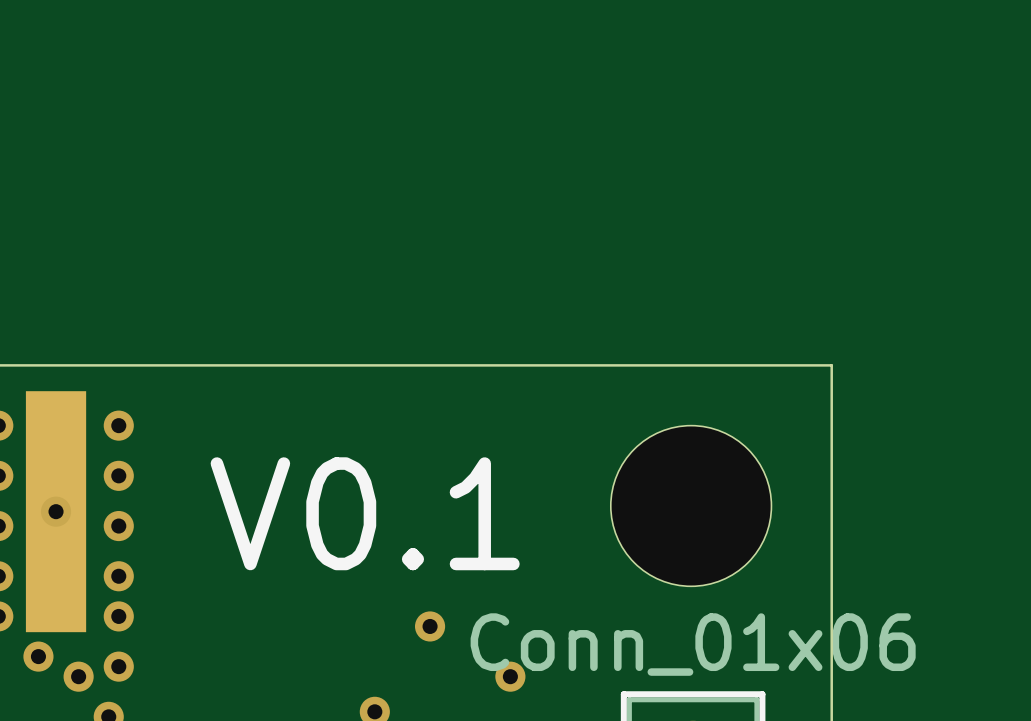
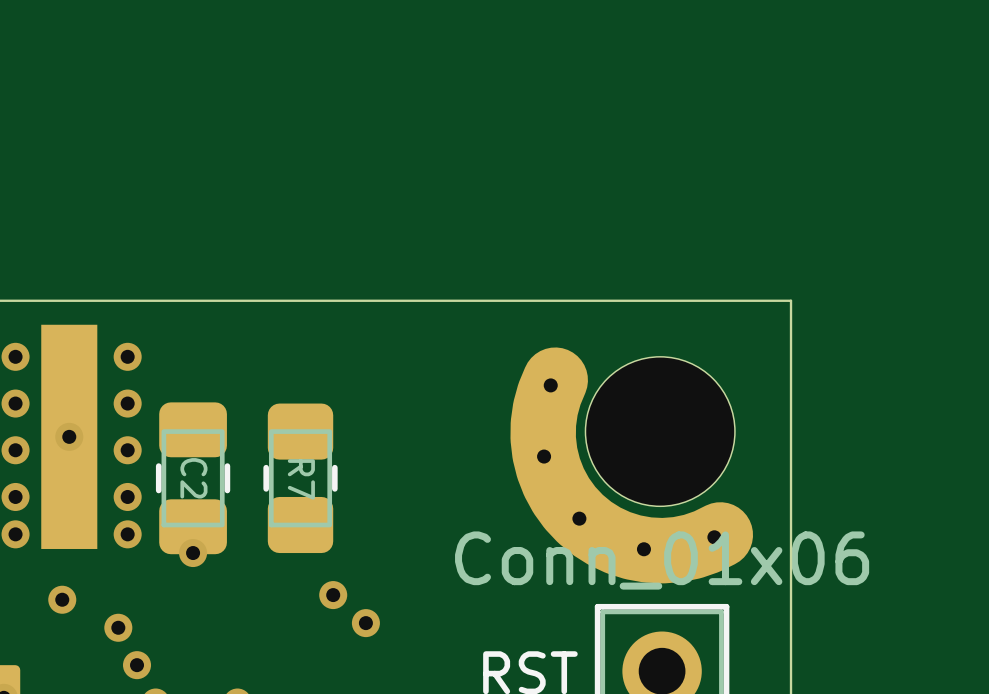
part footprint: [610, 425, 772, 587] -> [510, 347, 754, 584]
text: V0.1 (365, 513) -> none
C2: none -> (193, 478)
R7: none -> (300, 478)
via: (430, 626) -> none
via: none -> (193, 553)
via: (38, 656) -> none
via: (118, 666) -> none
via position: (78, 676) -> (62, 599)
via: (510, 676) -> none
via: none -> (333, 595)

